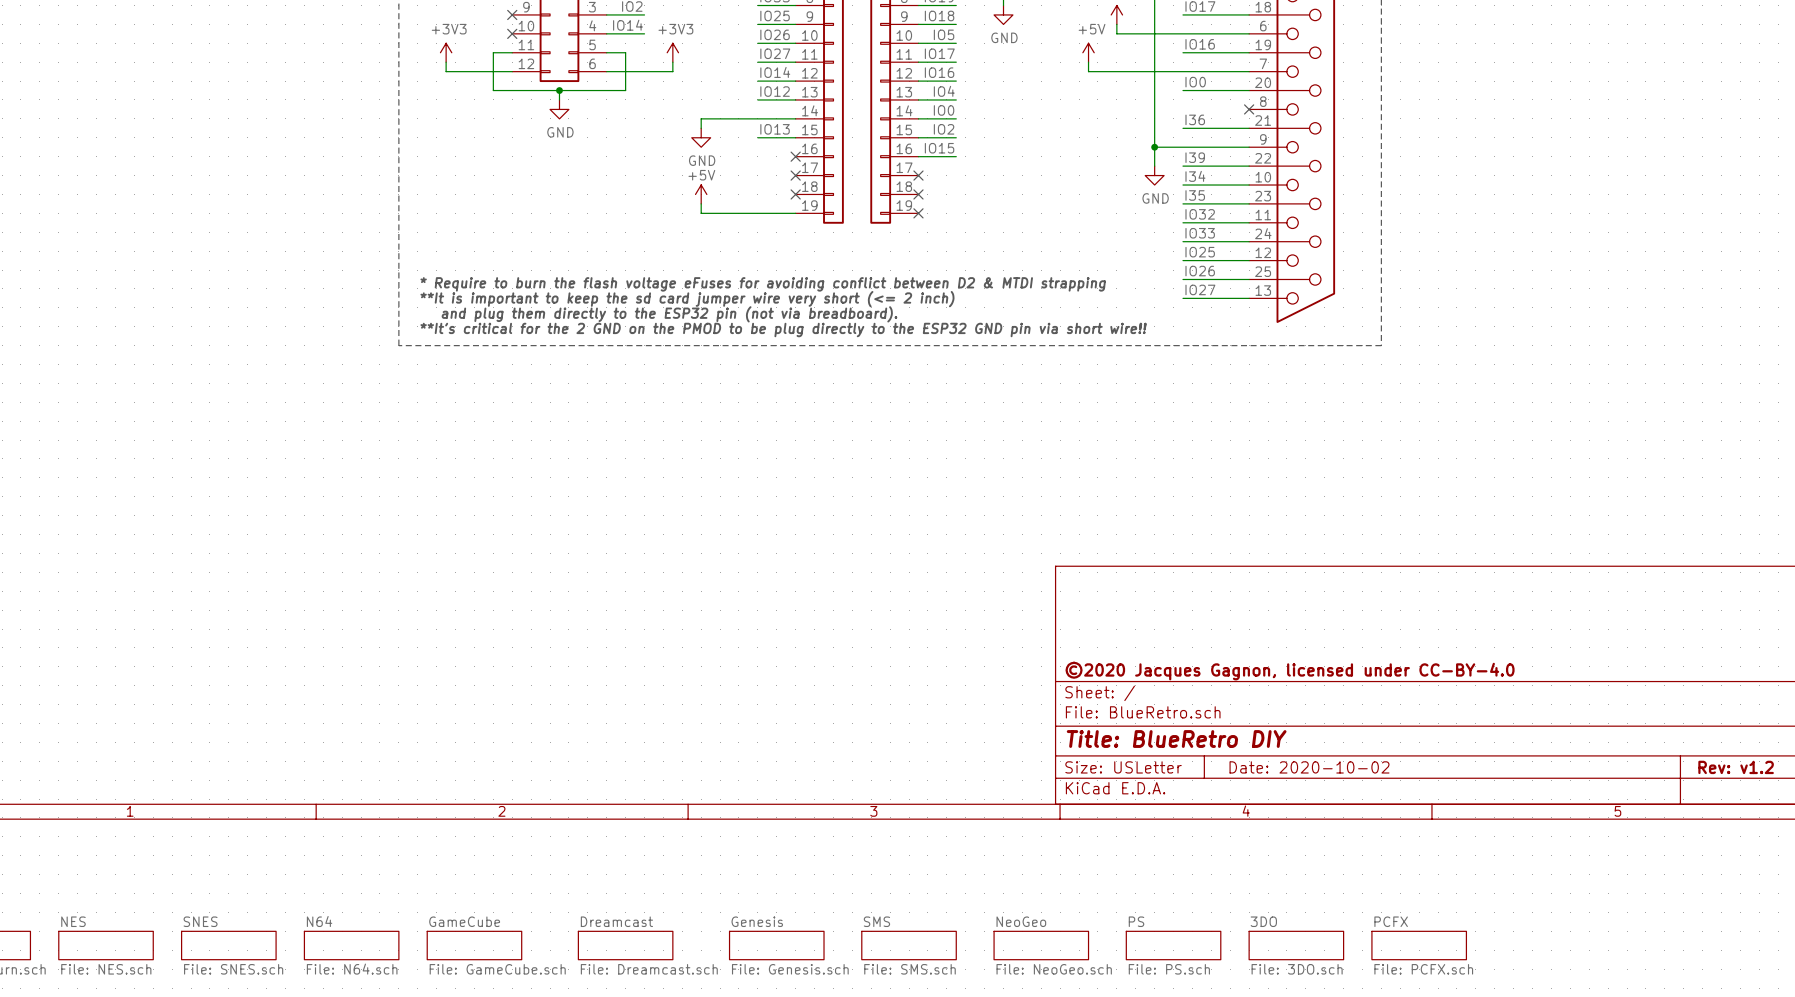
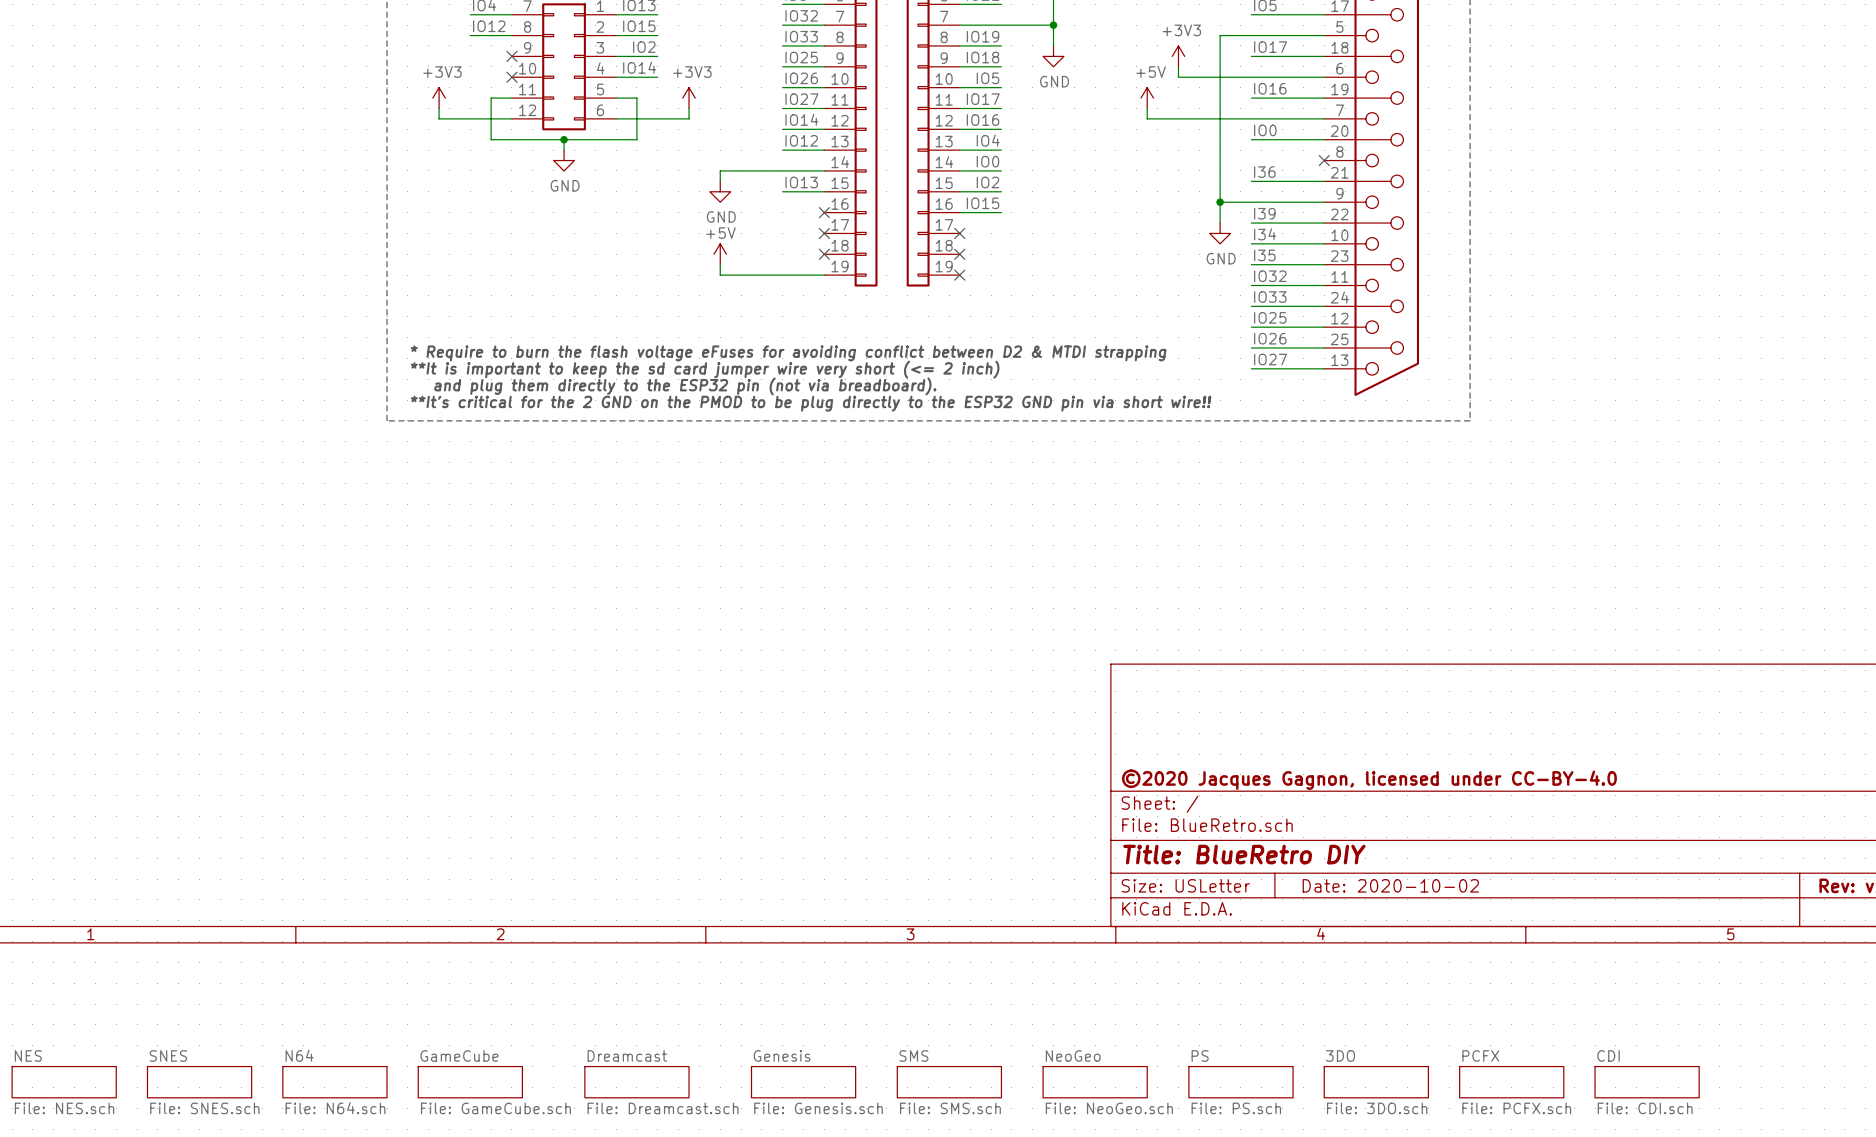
sheet CDI: none -> File: CDI.sch (1647, 1082)

